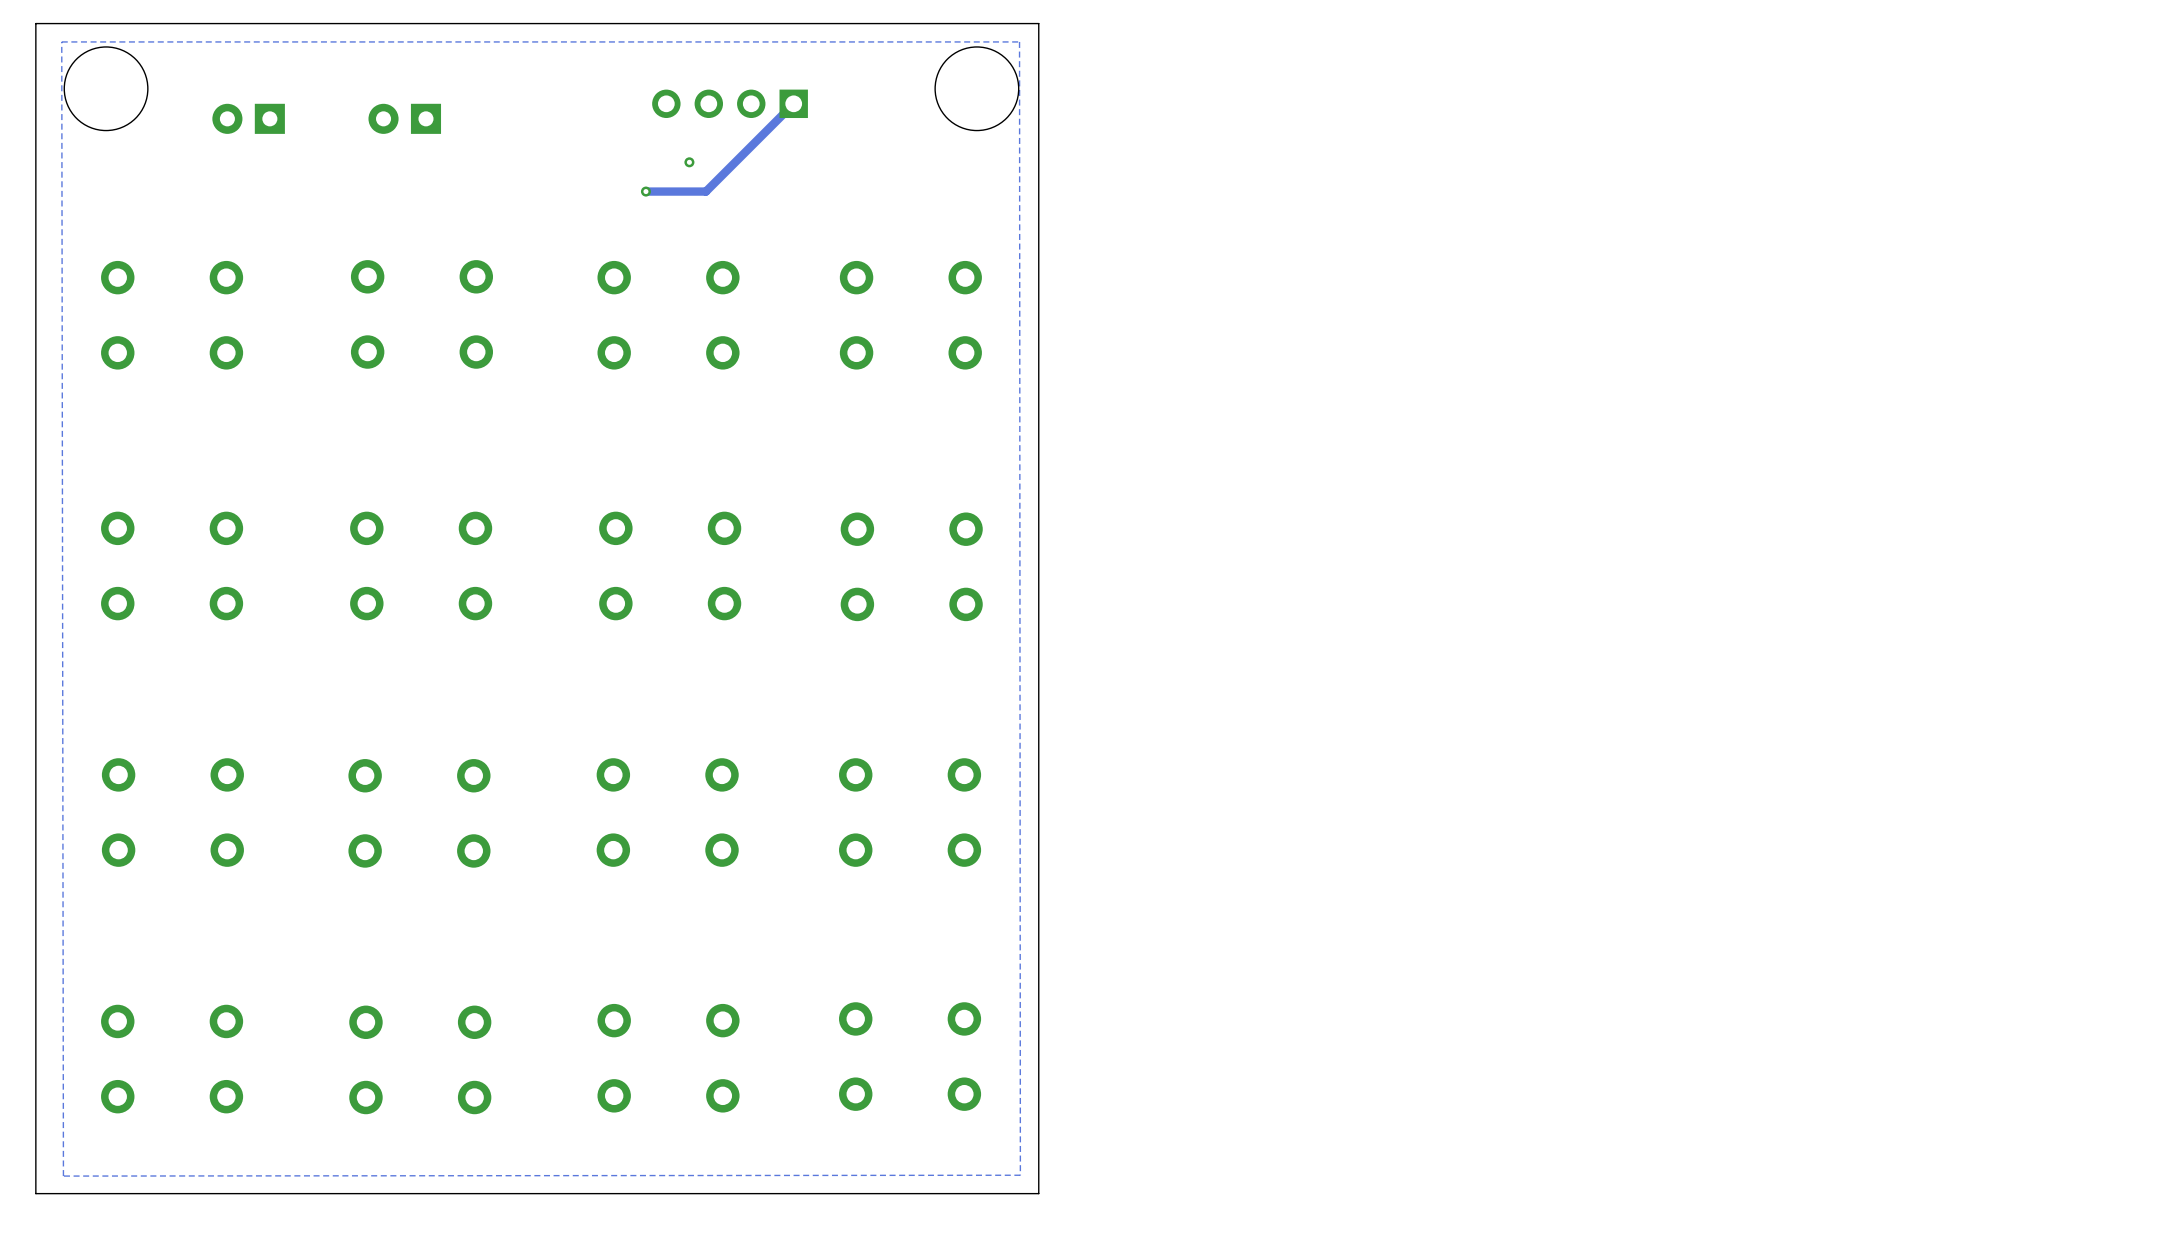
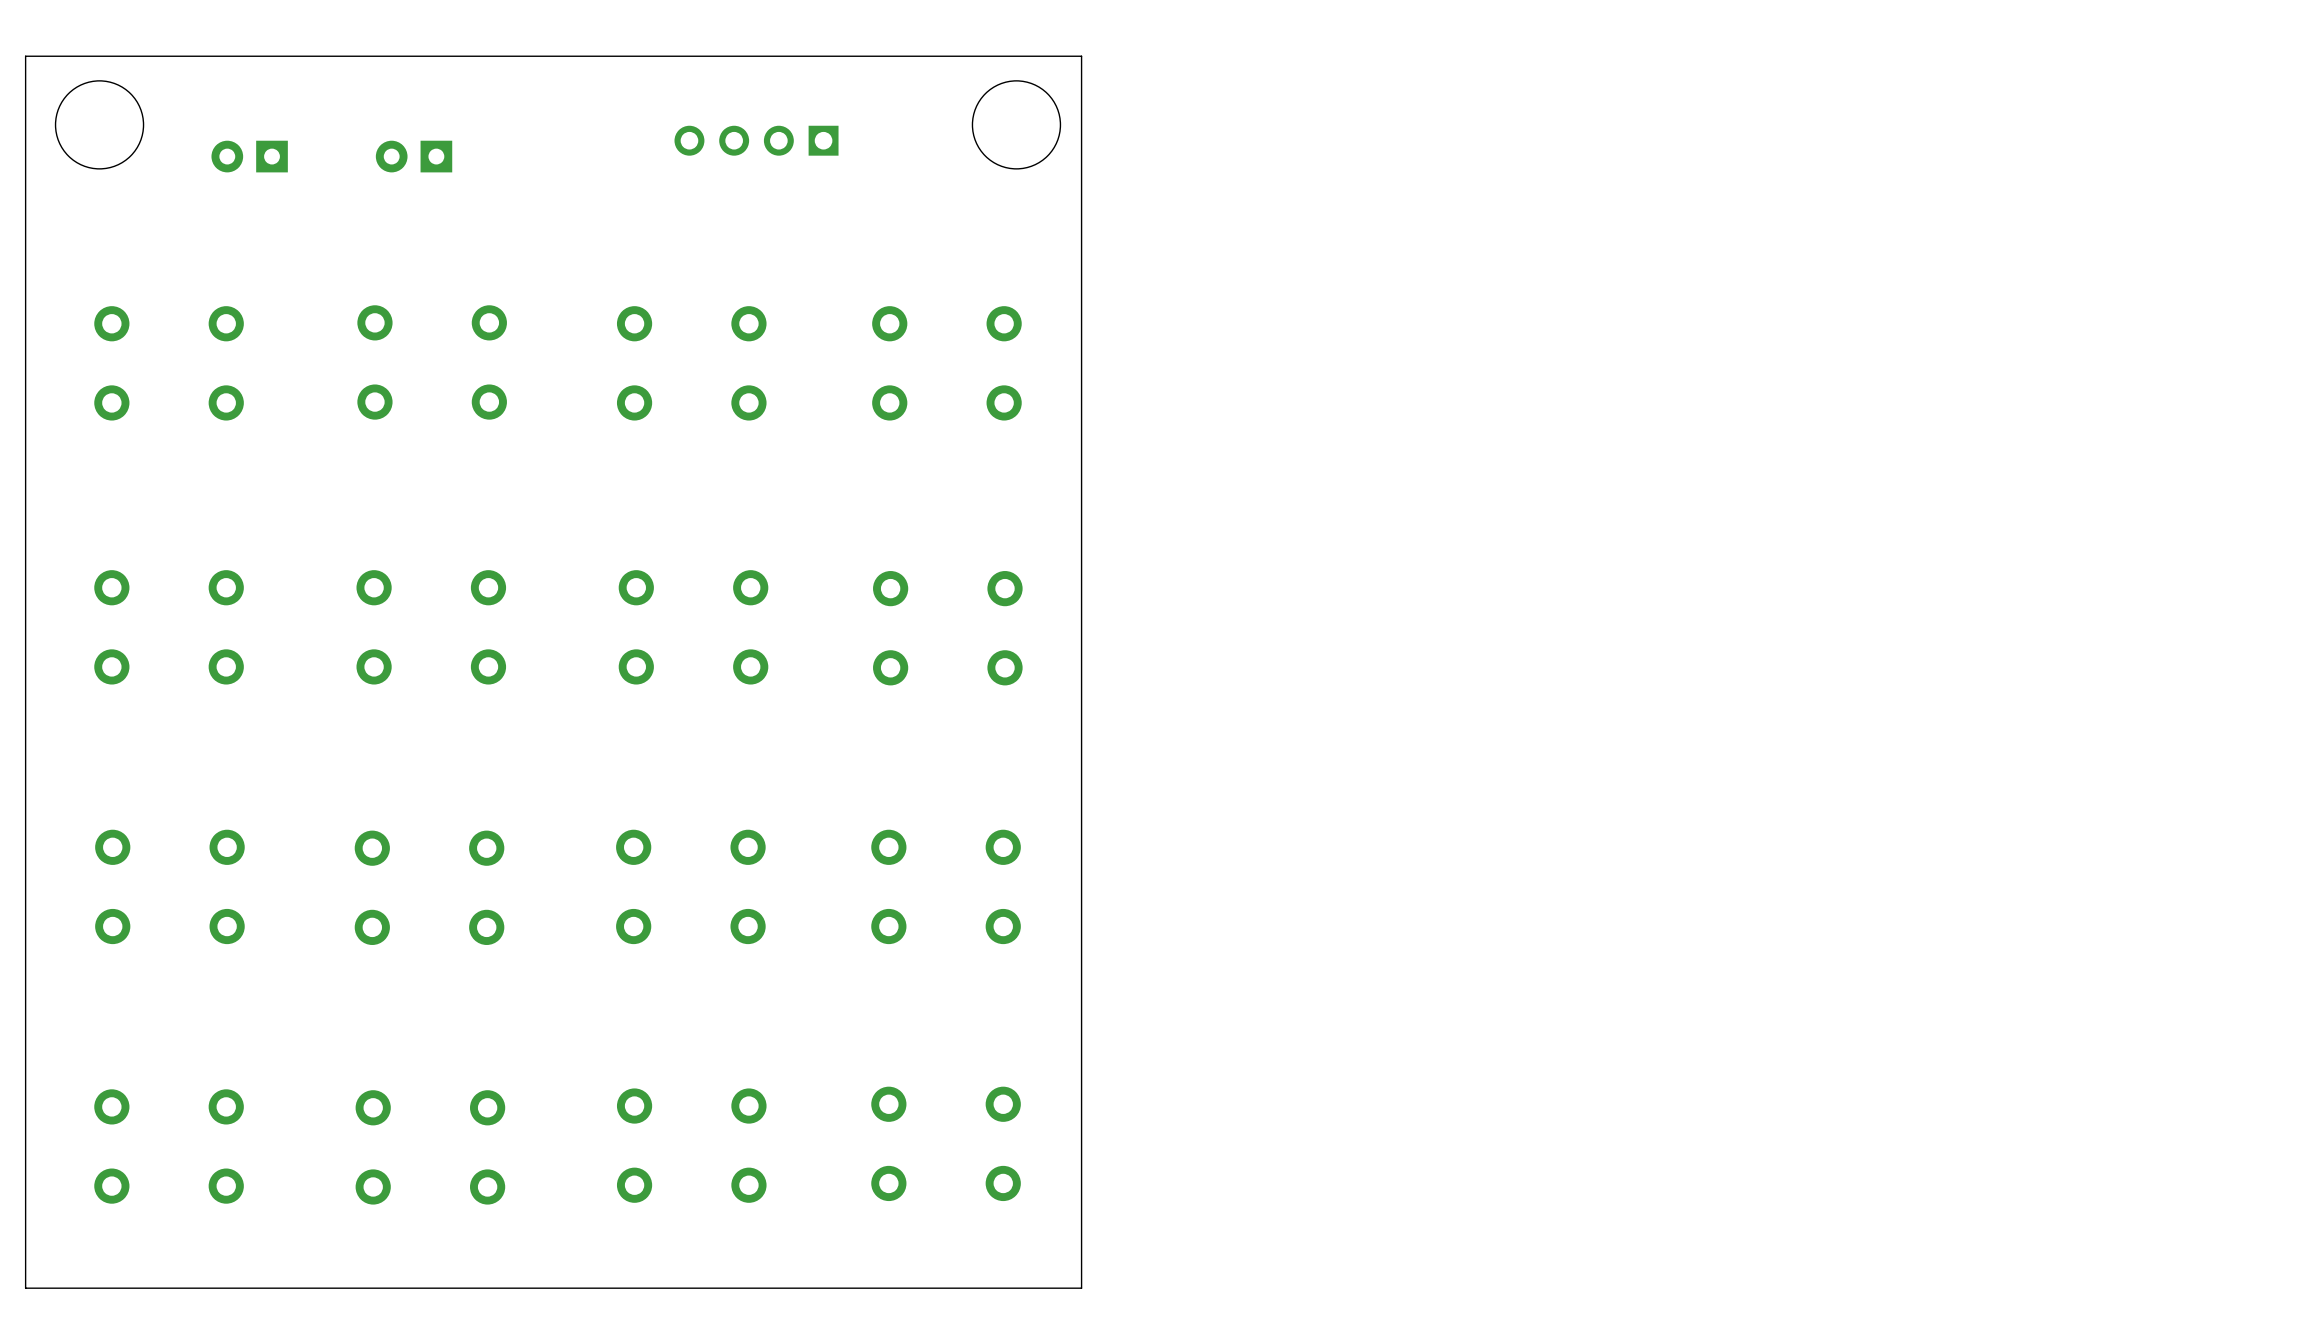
zone outline: (1019, 41) (61, 41) (63, 1176) (1020, 1175) (1019, 41) -> none
track: (793, 103) (705, 191) (645, 191) -> none
via: (689, 162) -> none
via: (645, 191) -> none

